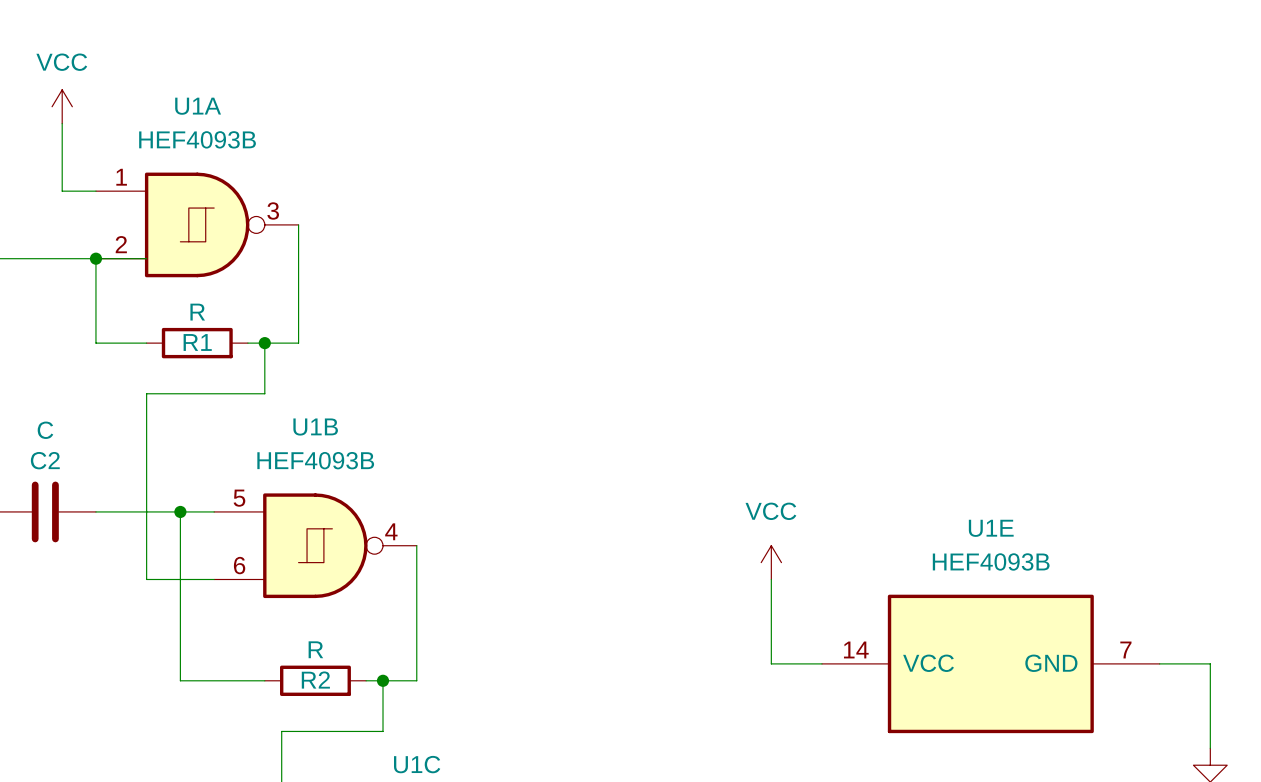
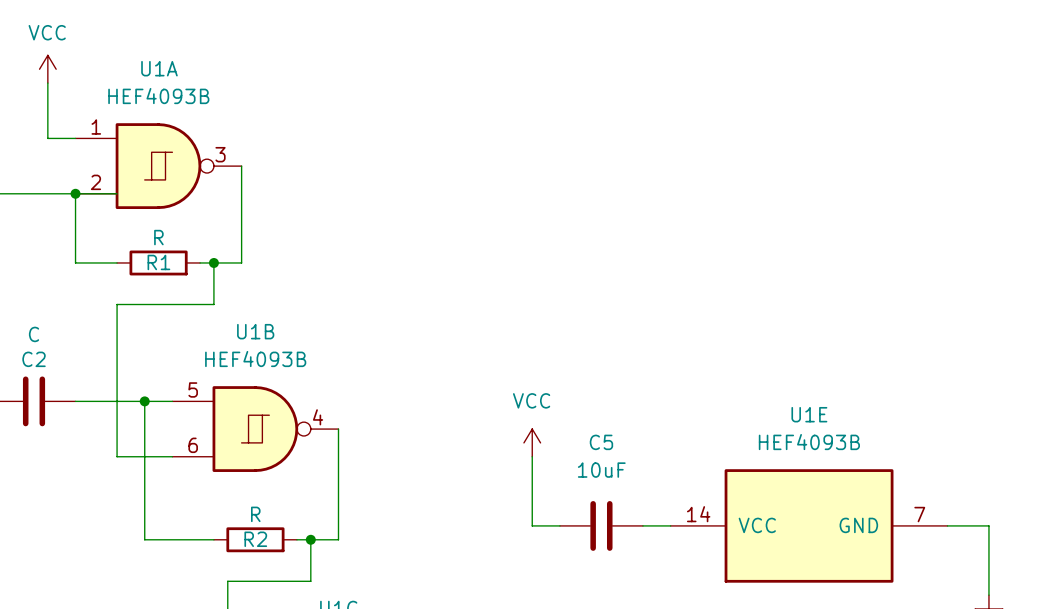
power symbol position: VCC (771, 562) -> VCC (532, 442)
wire: none -> (532, 456) (532, 525) (559, 525)
wire: (771, 579) (771, 663) (788, 663) -> none
C5: none -> 10uF (601, 525)

